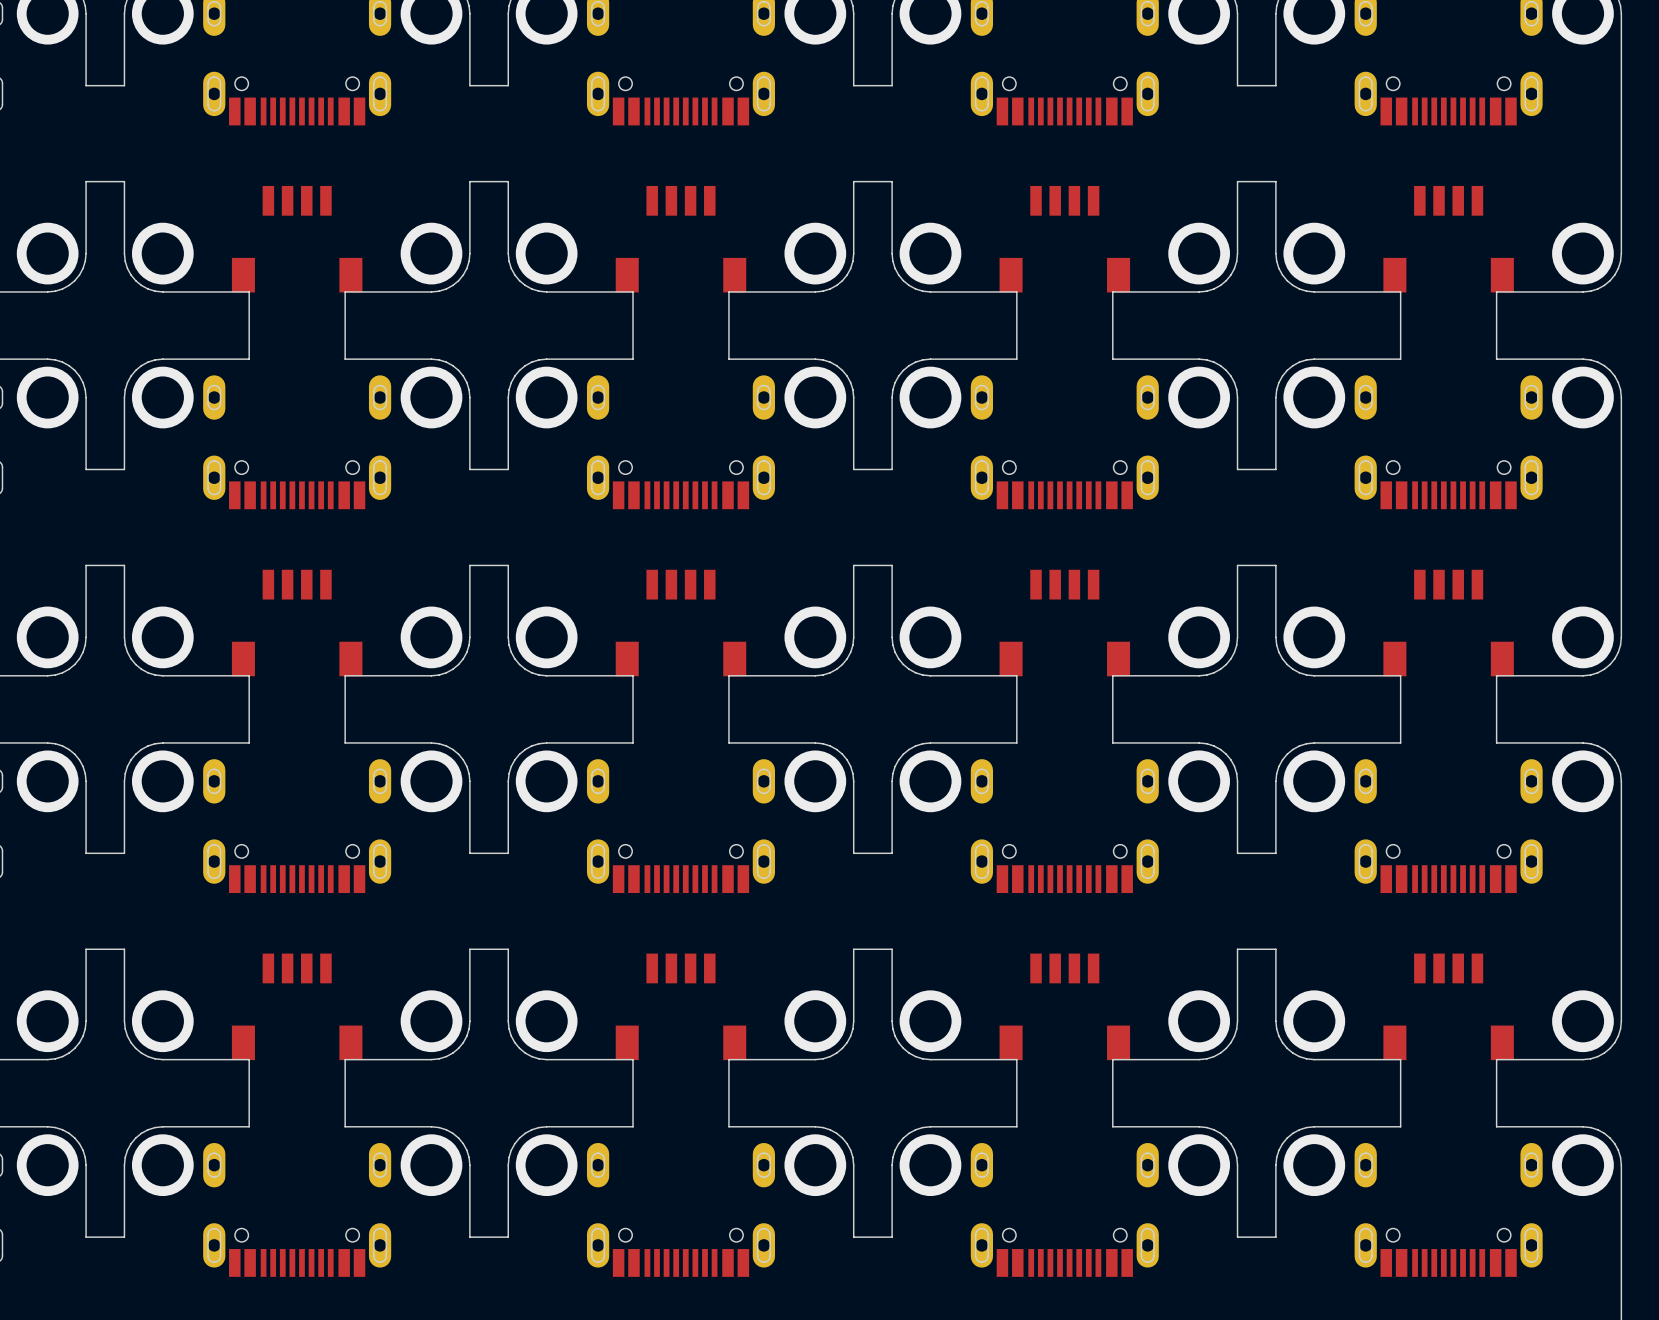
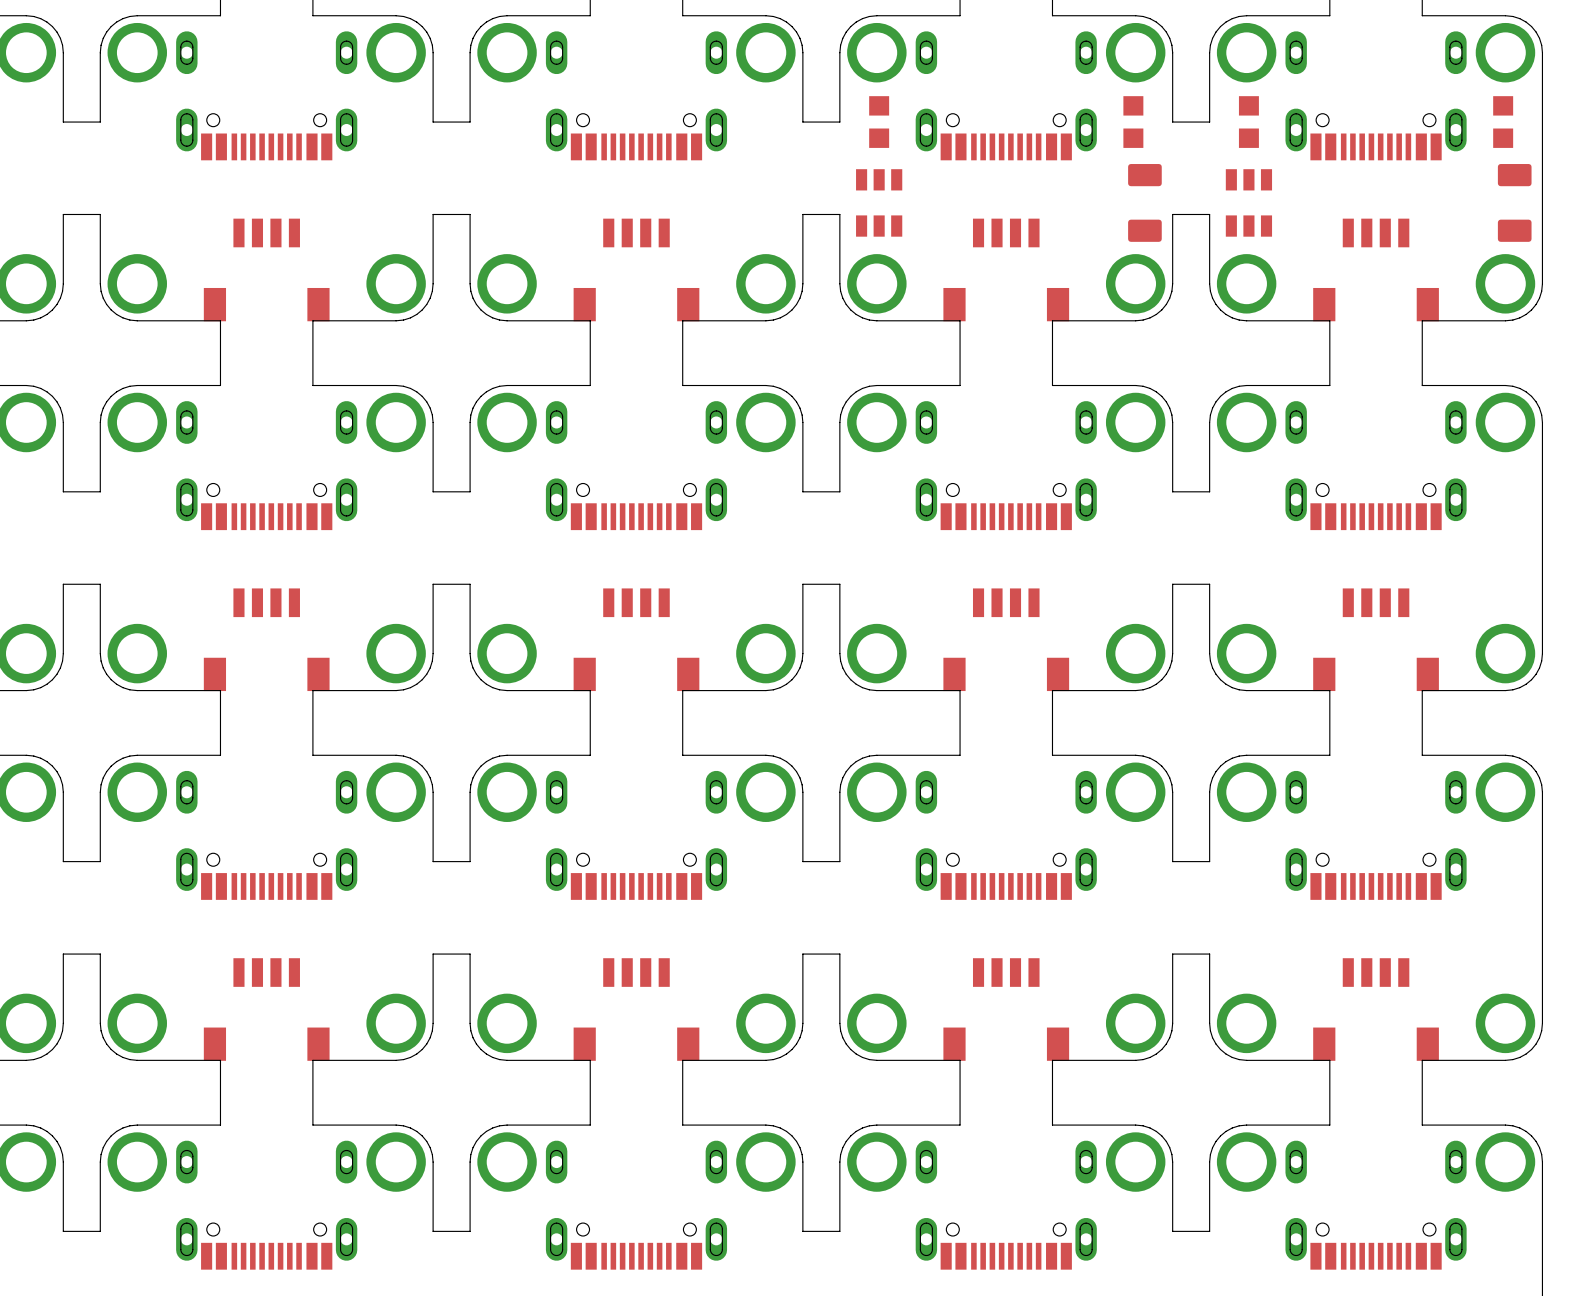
part: none -> (879, 122)
part: none -> (1133, 122)
part: none -> (1248, 122)
part: none -> (1503, 122)
part: none -> (879, 202)
part: none -> (1144, 202)
part: none -> (1248, 202)
part: none -> (1514, 202)

